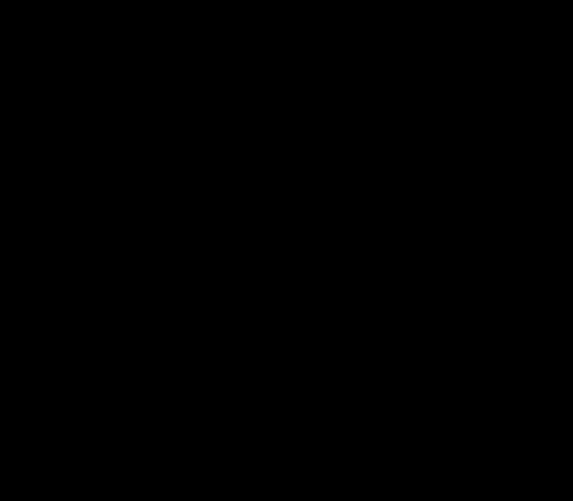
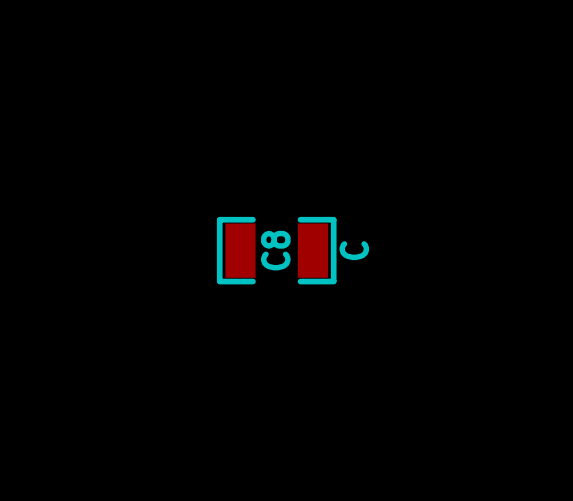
C8: none -> C (276, 250)

